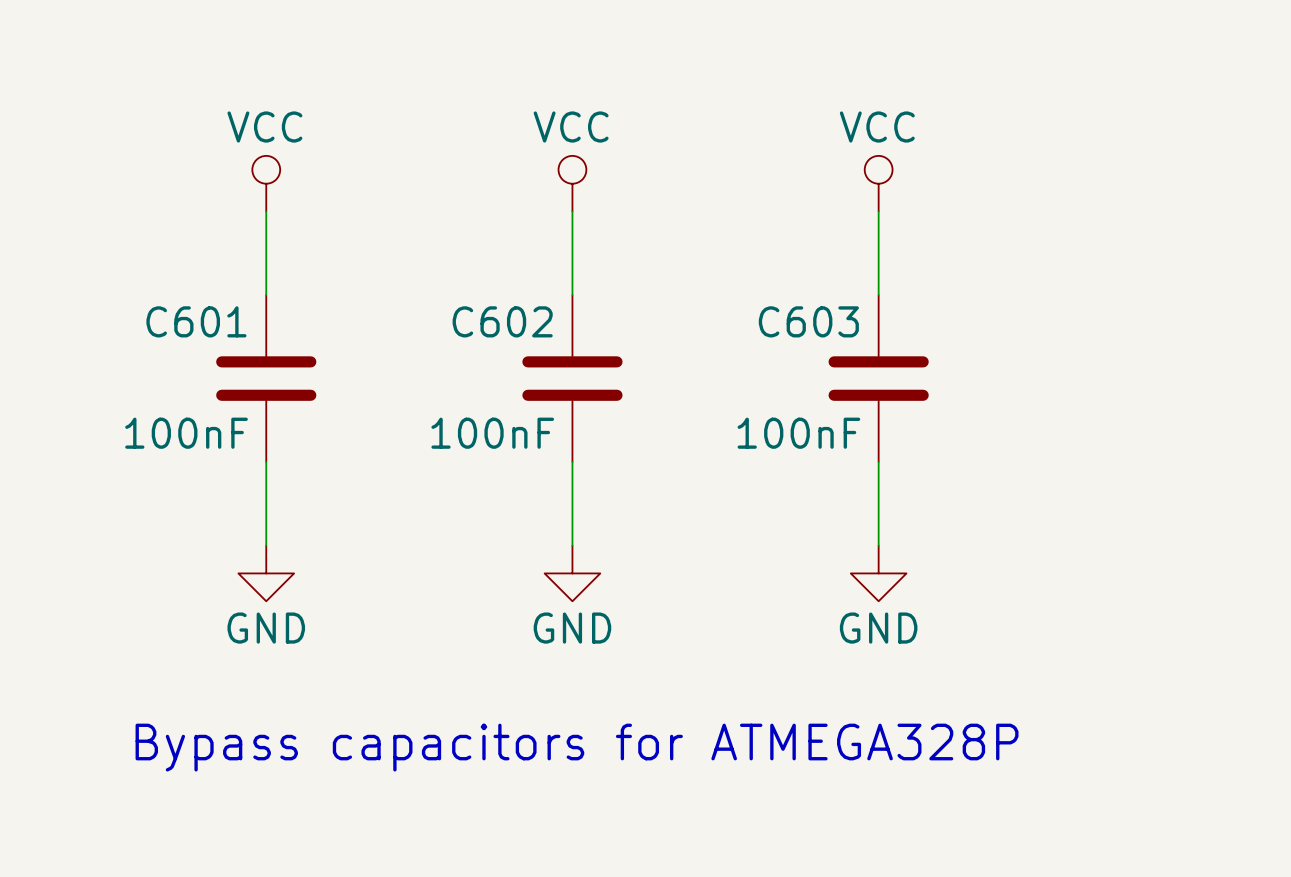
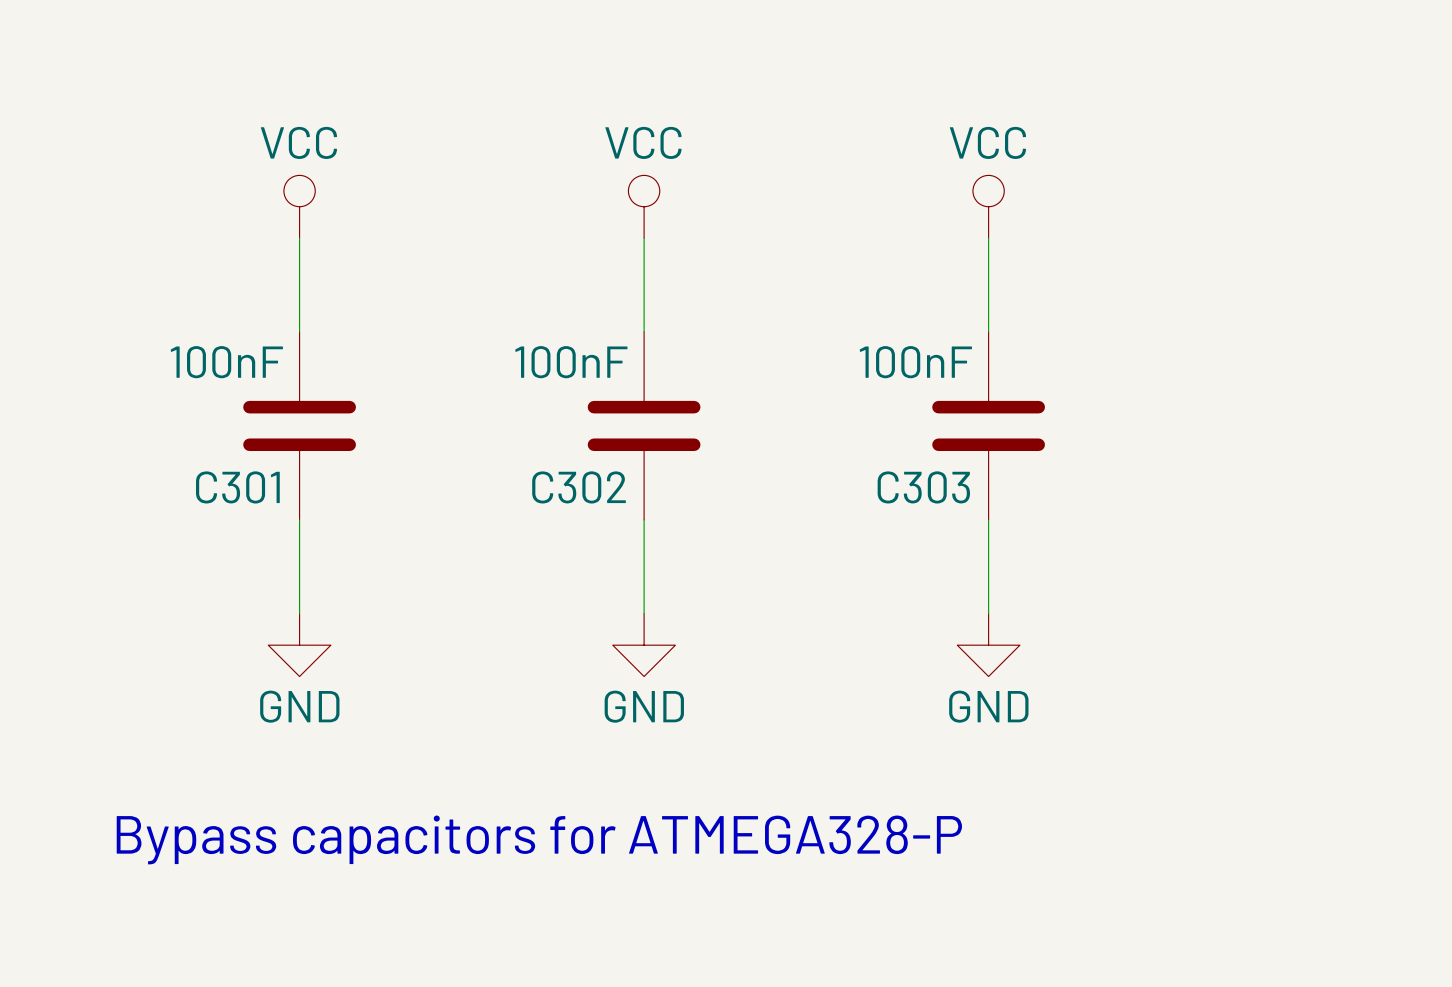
C601 name: C601 (196, 321) -> C301 (237, 487)
C602 name: C602 (502, 321) -> C302 (579, 487)
C603 name: C603 (808, 321) -> C303 (923, 487)
C601 value position: 100nF (186, 433) -> 100nF (226, 362)
C602 value position: 100nF (492, 433) -> 100nF (571, 362)
C603 value position: 100nF (798, 433) -> 100nF (915, 362)
text: Bypass capacitors for ATMEGA328P (577, 747) -> Bypass capacitors for ATMEGA328-P (539, 839)

